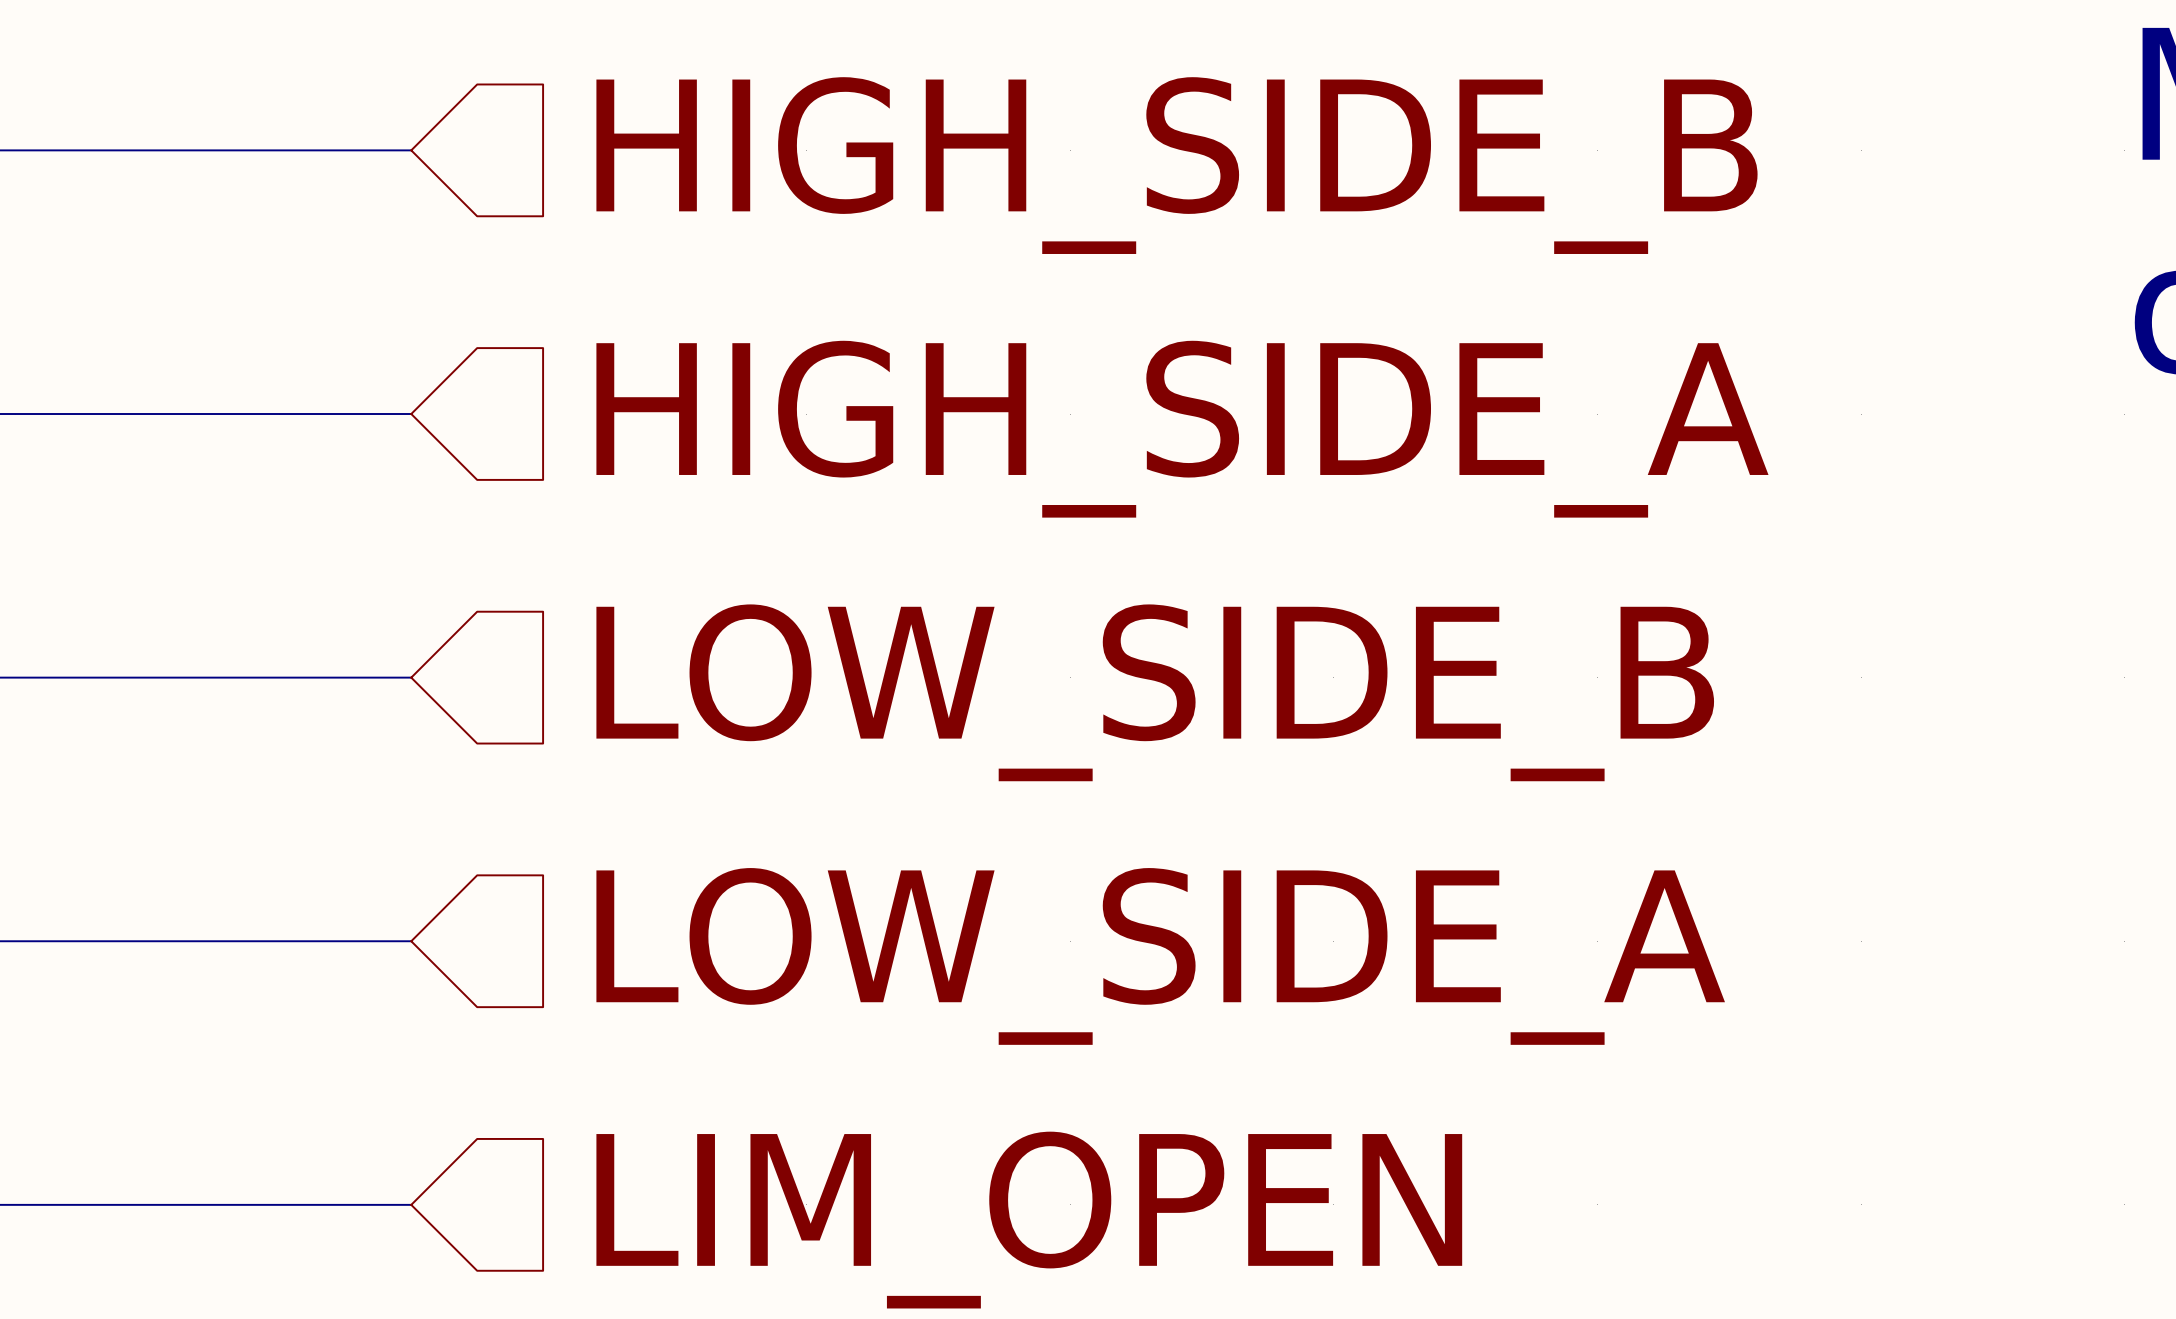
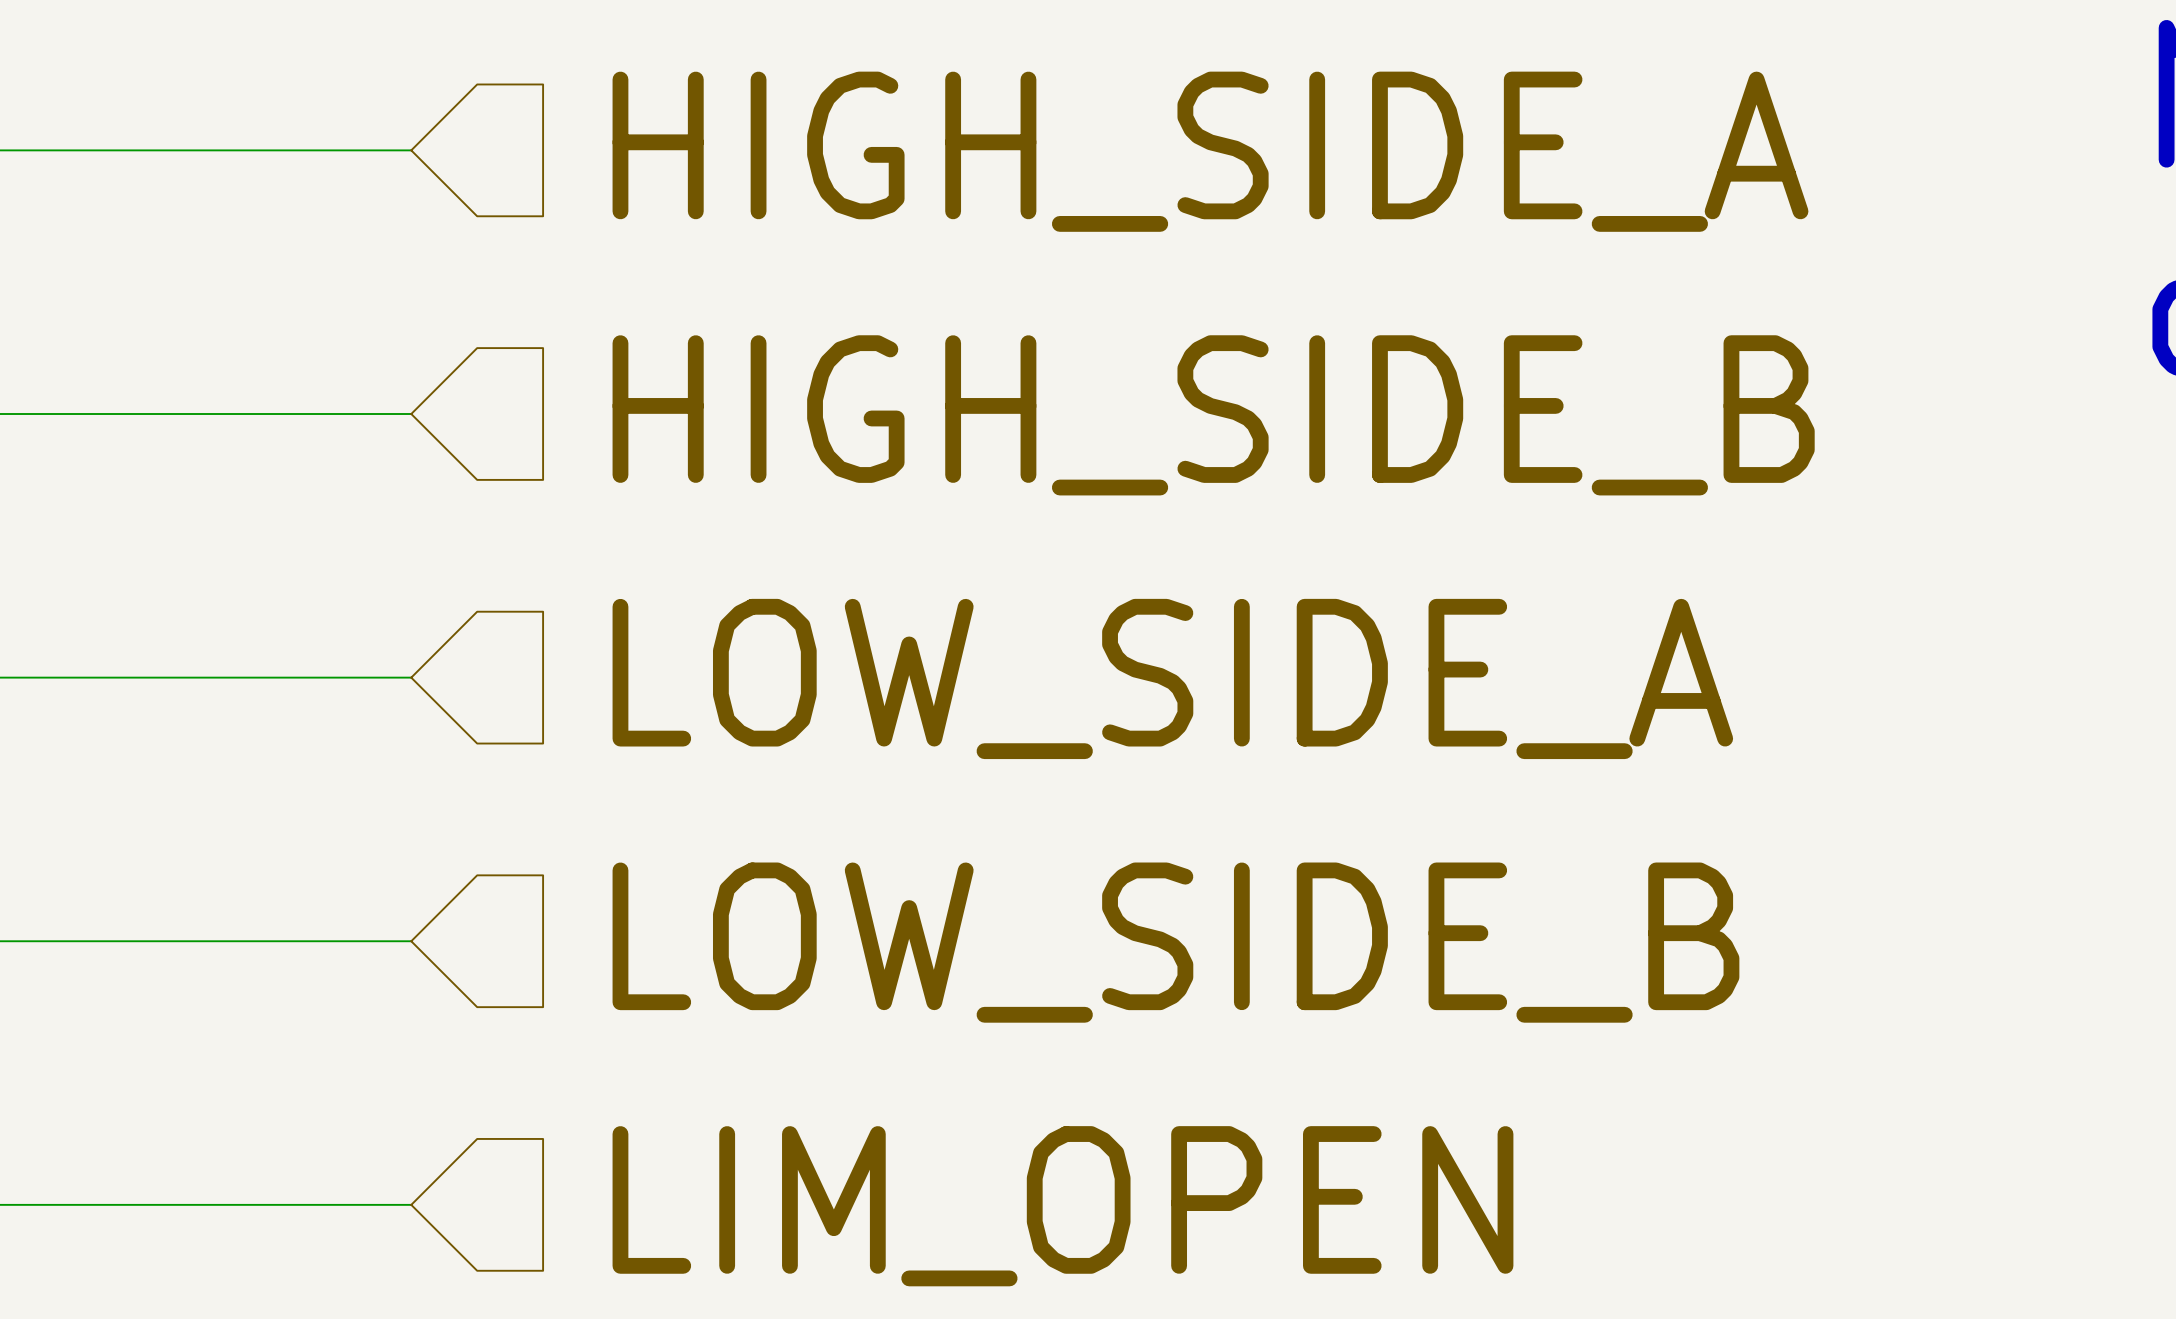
hierarchical label: HIGH_SIDE_B (1177, 165) -> HIGH_SIDE_A (1210, 151)
hierarchical label: HIGH_SIDE_A (1182, 429) -> HIGH_SIDE_B (1213, 415)
hierarchical label: LOW_SIDE_B (1155, 692) -> LOW_SIDE_A (1172, 678)
hierarchical label: LOW_SIDE_A (1160, 956) -> LOW_SIDE_B (1175, 942)

